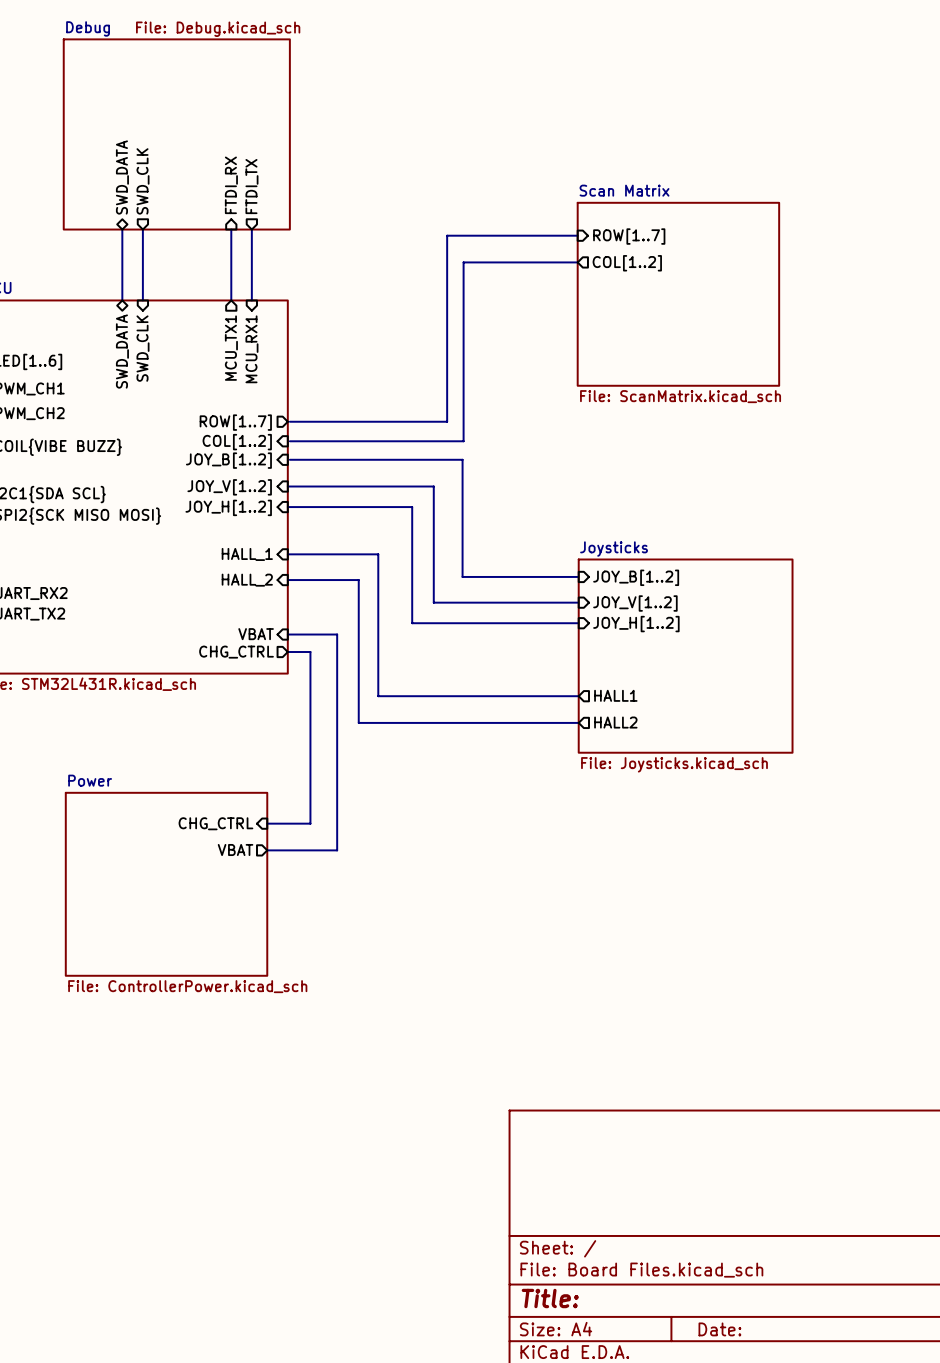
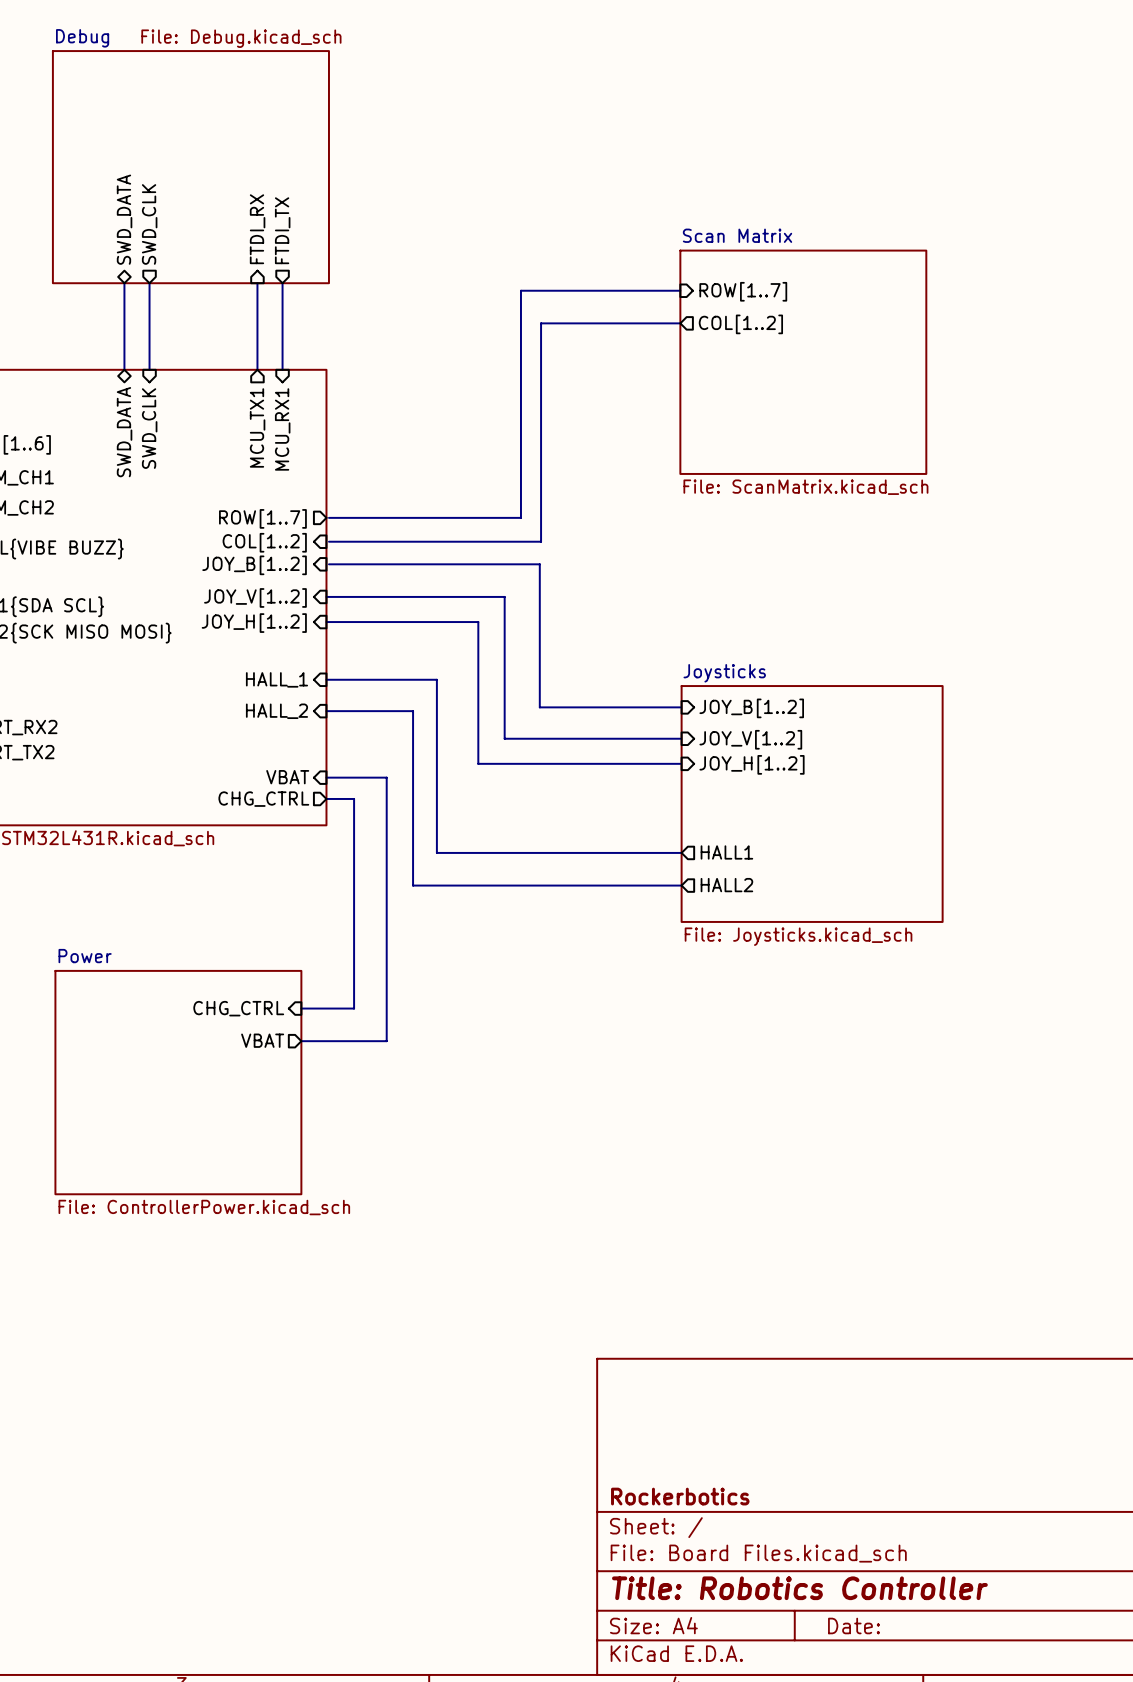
title block: none -> Rockerbotics (680, 1496)
title block: Title: (550, 1298) -> Title: Robotics Controller (799, 1588)

